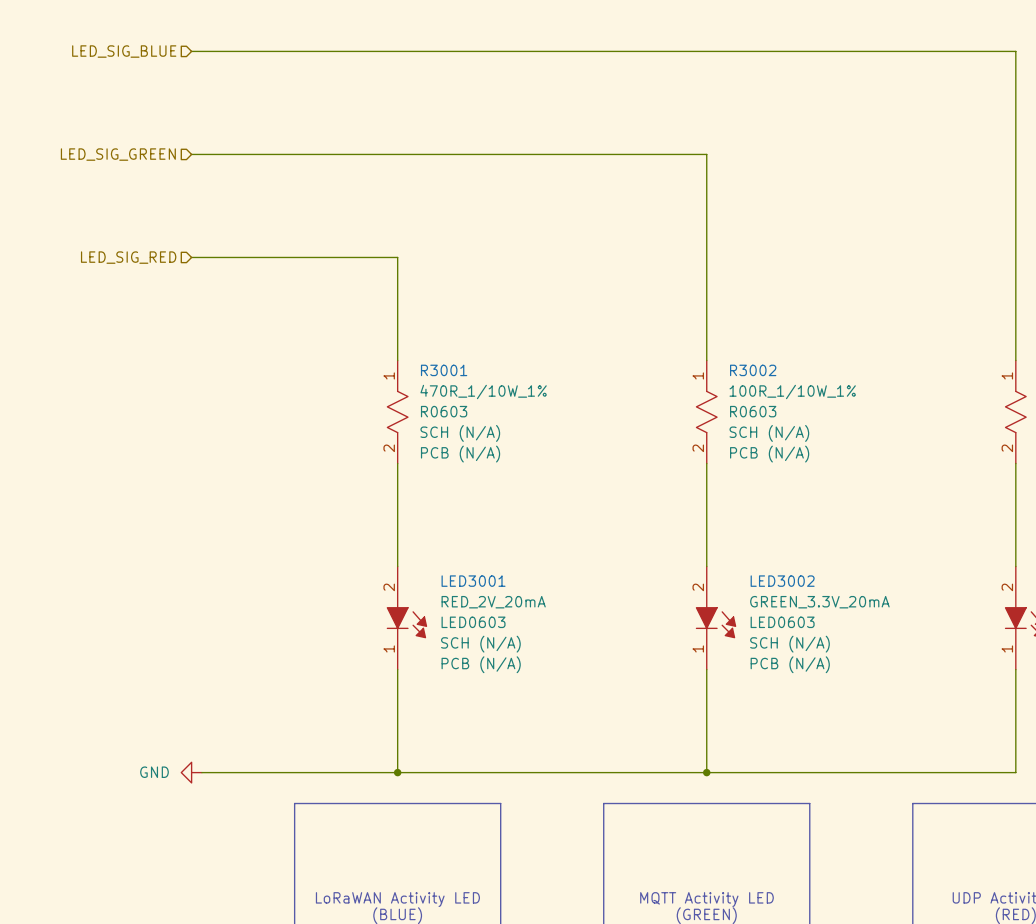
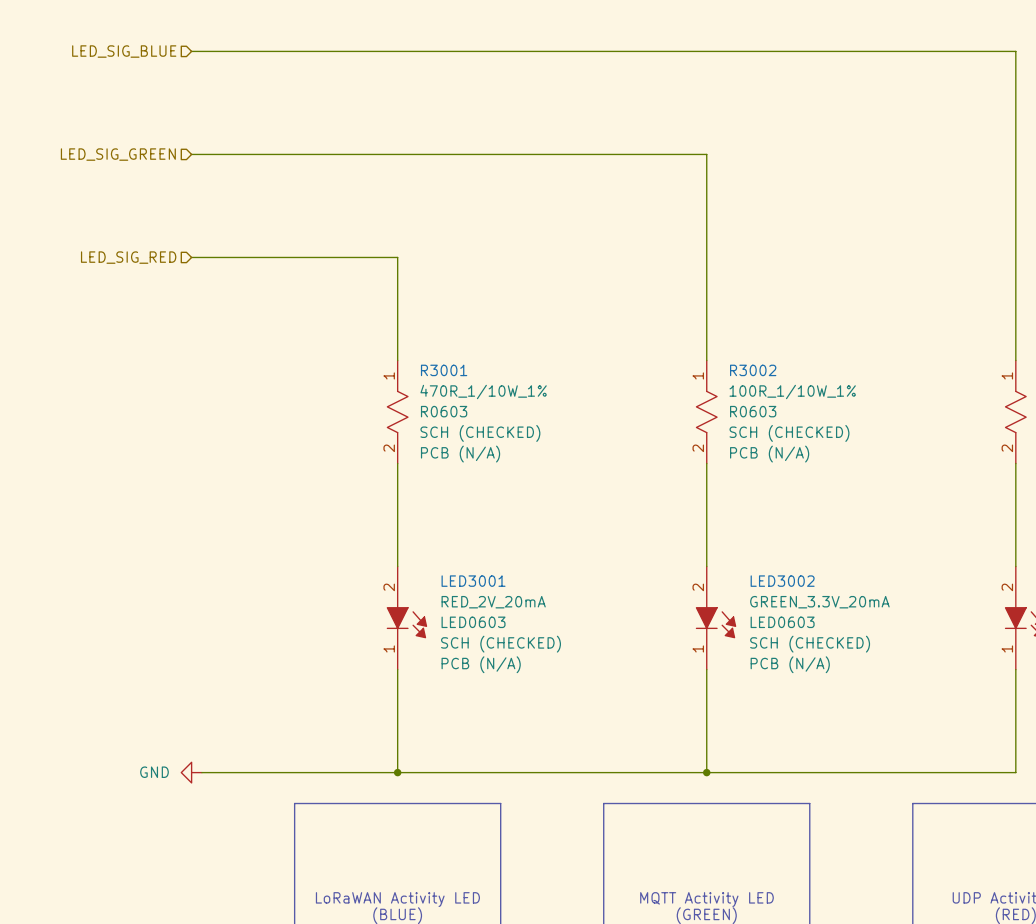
R3001 text: SCH (N/A) (460, 433) -> SCH (CHECKED) (480, 433)
R3002 text: SCH (N/A) (769, 433) -> SCH (CHECKED) (789, 433)
LED3001 text: SCH (N/A) (480, 644) -> SCH (CHECKED) (501, 644)
LED3002 text: SCH (N/A) (789, 644) -> SCH (CHECKED) (810, 644)

